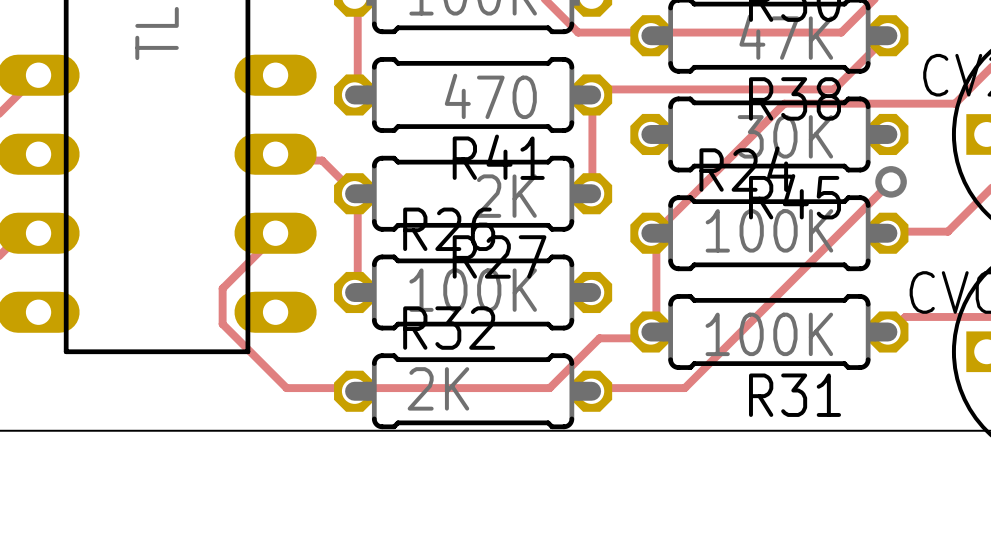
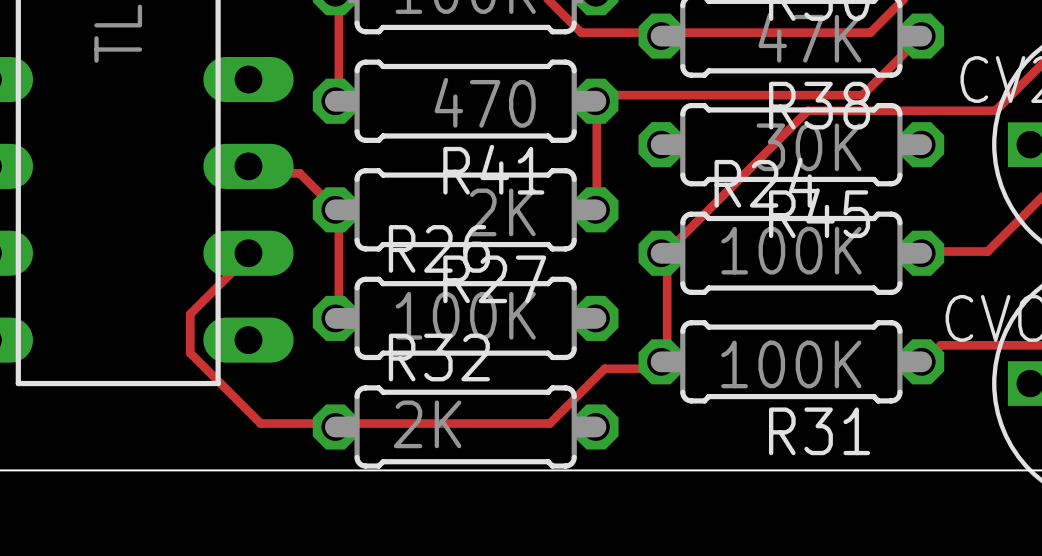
track: (891, 181) (684, 388) (592, 388) (591, 391) -> none
via: (891, 181) -> none

